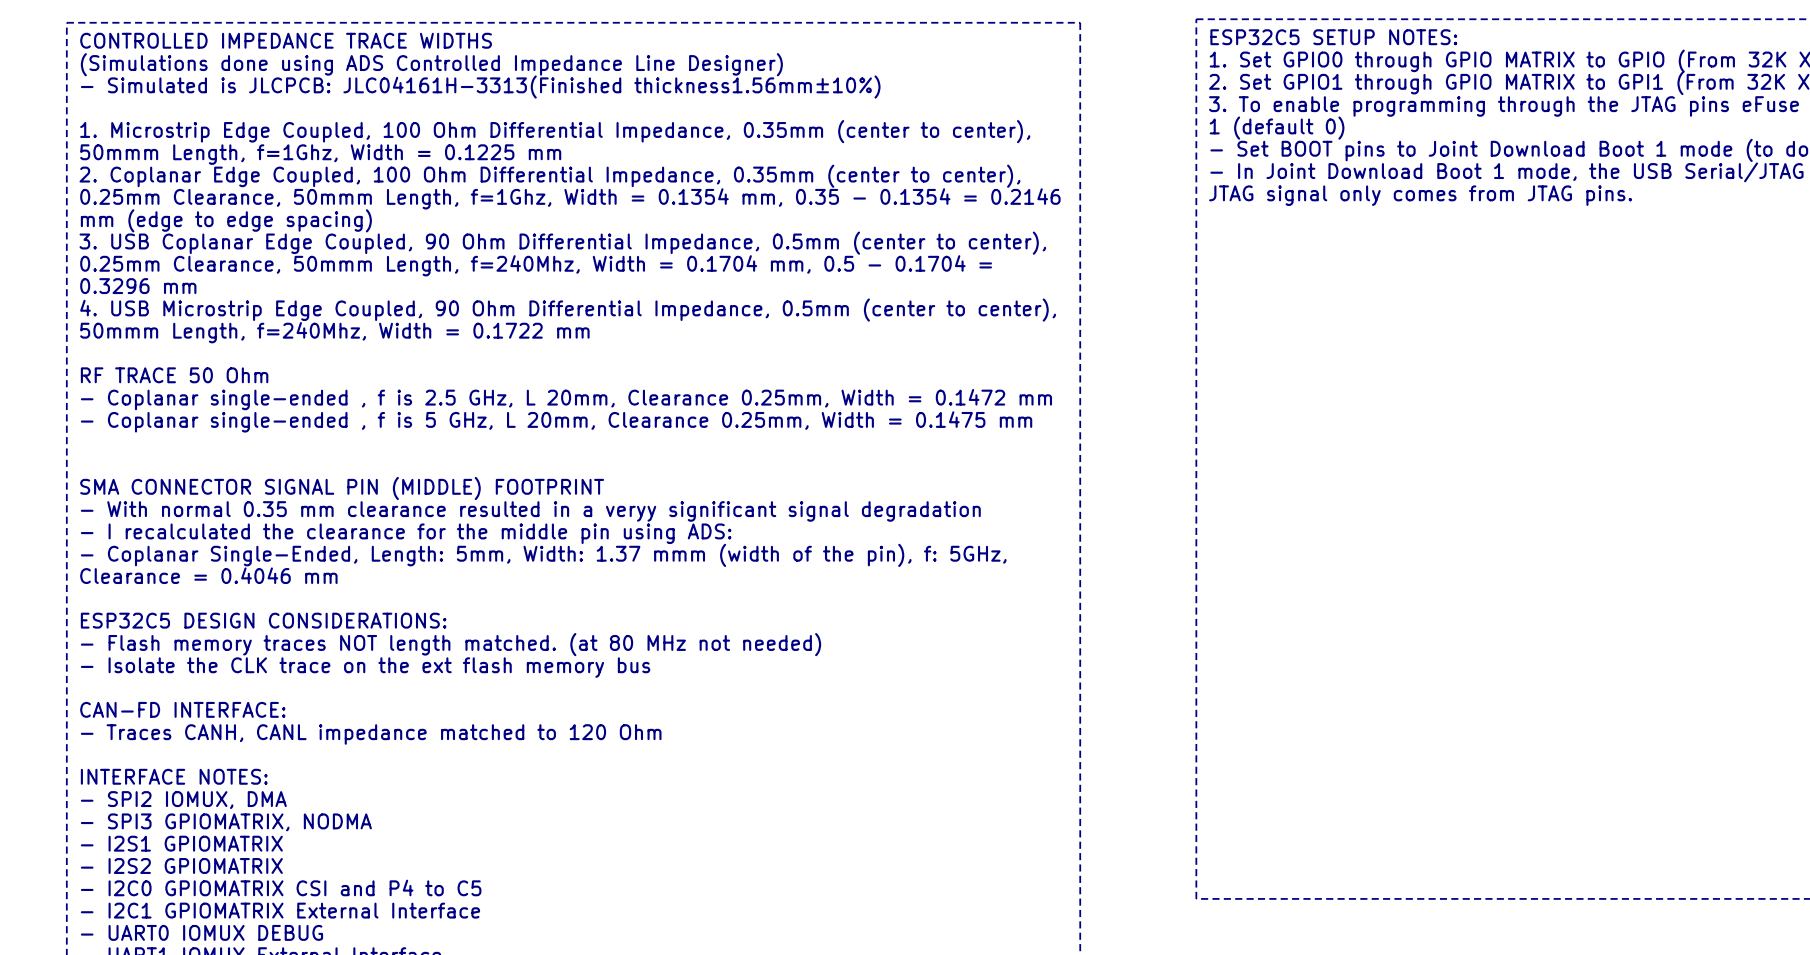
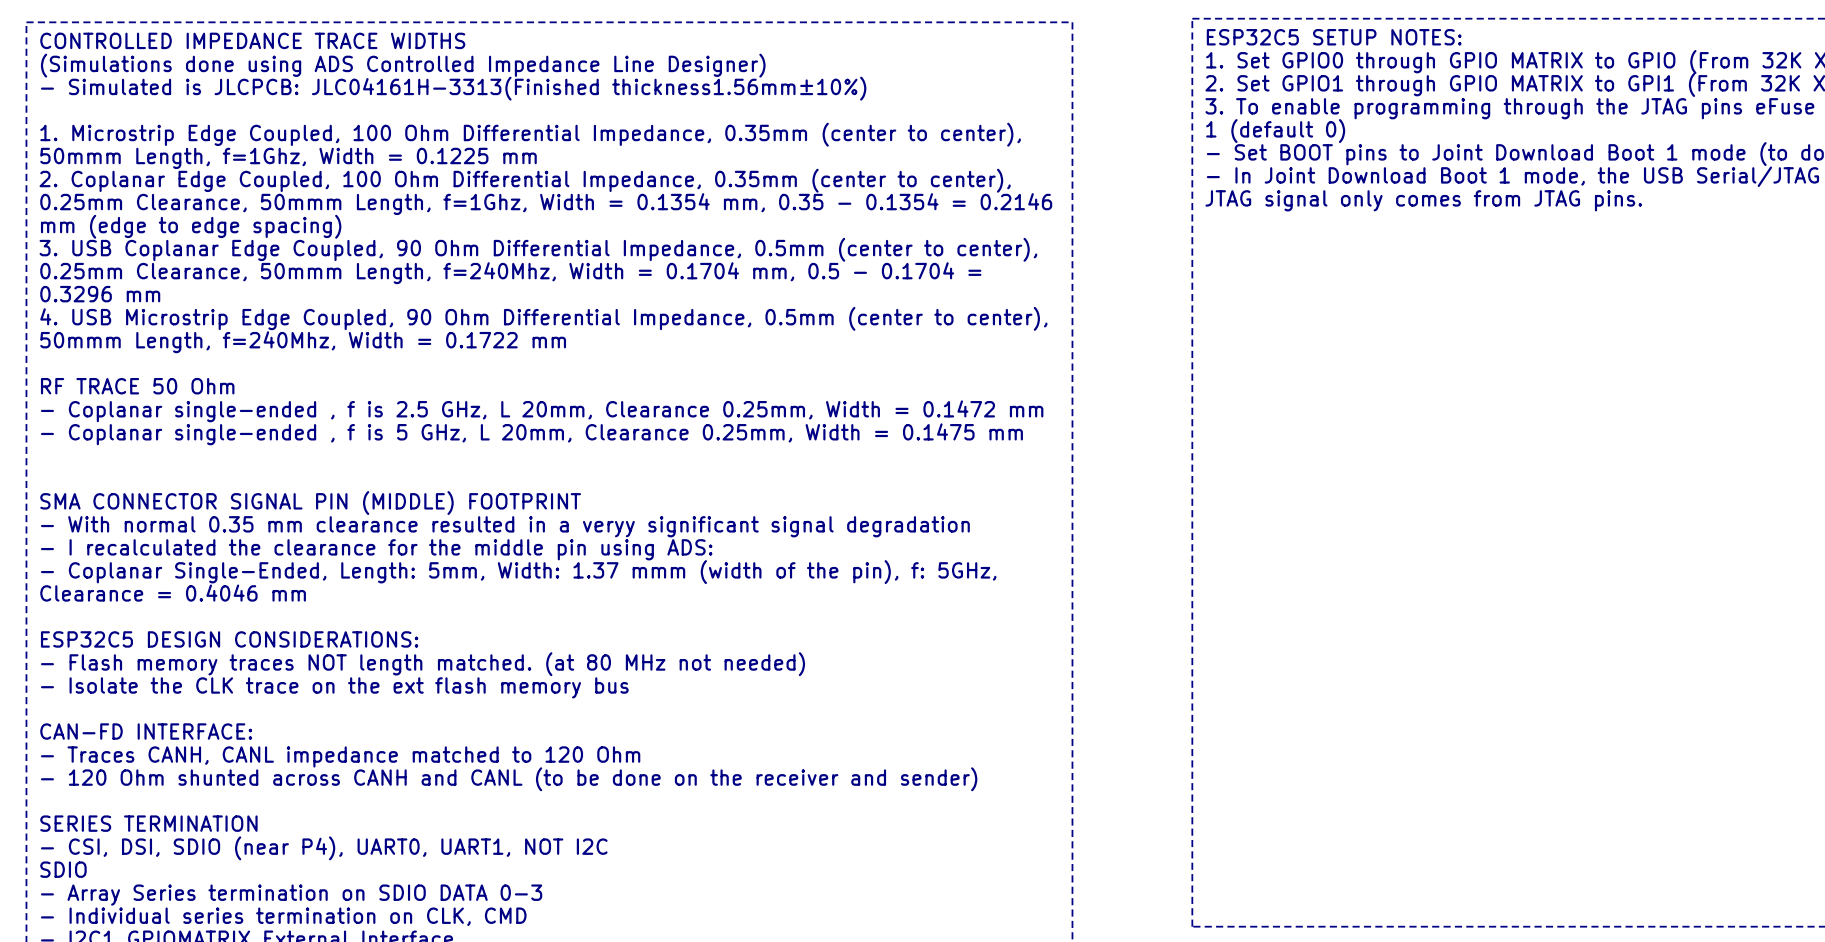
text: none -> - 120 Ohm shunted across CANH and CANL (to be done on the receiver and sender) (509, 779)
text: INTERFACE NOTES: (174, 776) -> none
text: - SPI2 IOMUX, DMA (183, 800) -> SERIES TERMINATION (148, 823)
text: - SPI3 GPIOMATRIX, NODMA (226, 822) -> - CSI, DSI, SDIO (near P4), UART0, UART1, NOT I2C (324, 848)
text: - I2S1 GPIOMATRIX (181, 843) -> SDIO (63, 869)
text: - I2S2 GPIOMATRIX (181, 865) -> - Array Series termination on SDIO DATA 0-3 (291, 895)
text: - I2C0 GPIOMATRIX CSI and P4 to C5 (281, 887) -> - Individual series termination on CLK, CMD (283, 916)

